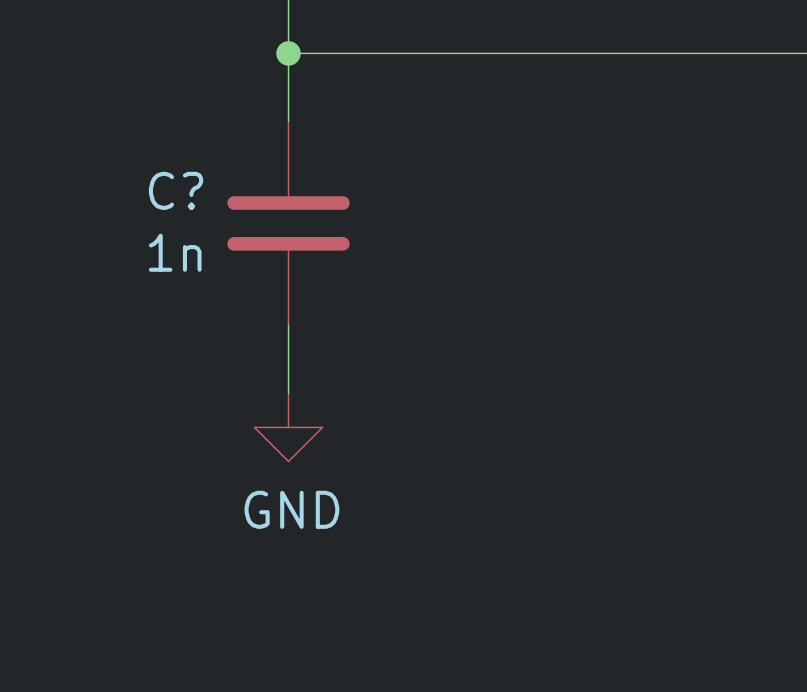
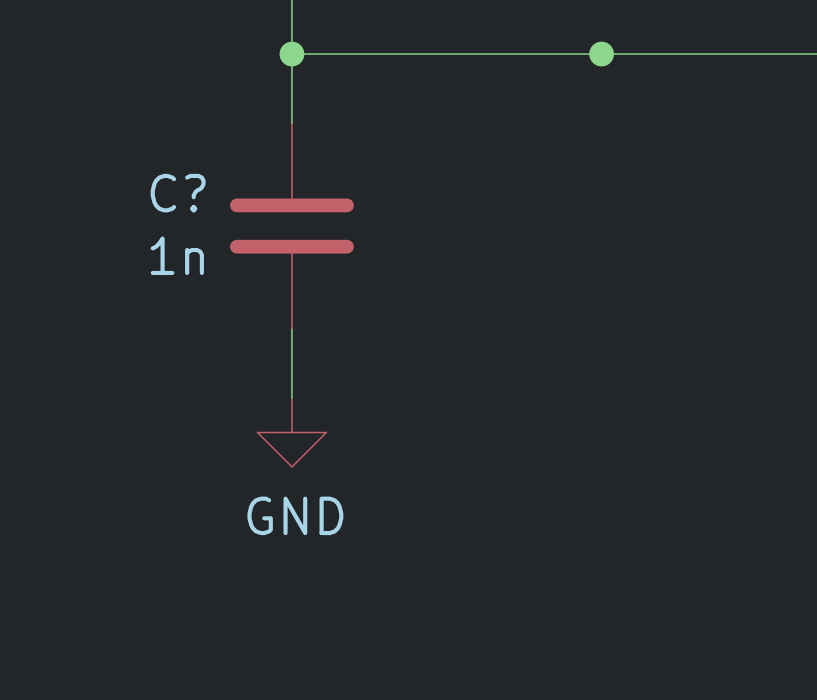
junction: none -> (601, 54)

